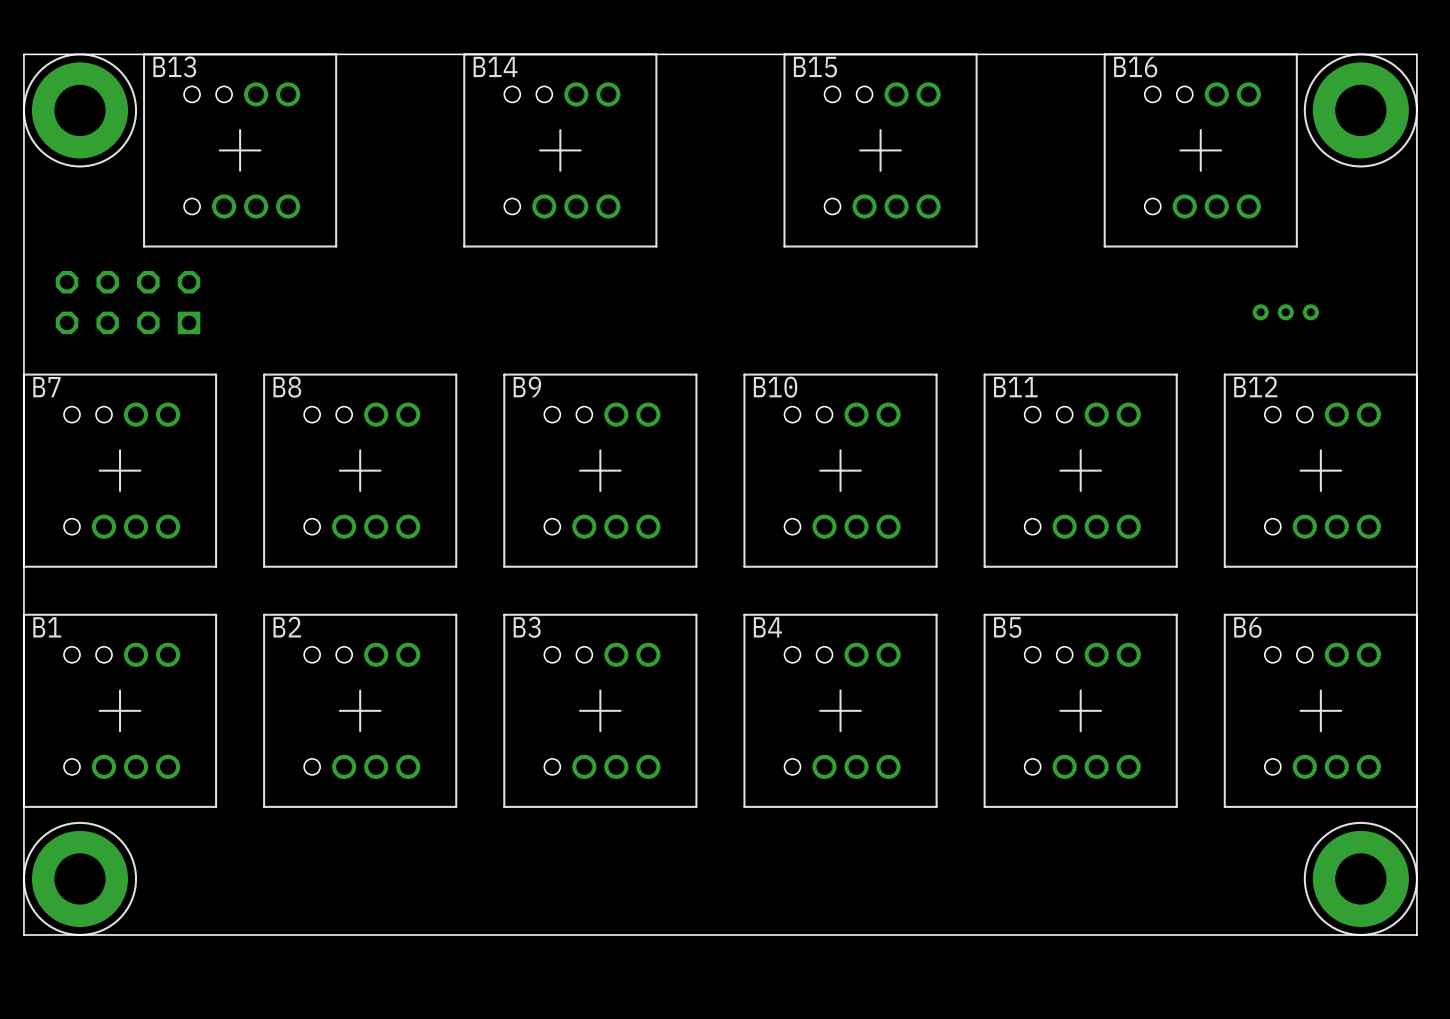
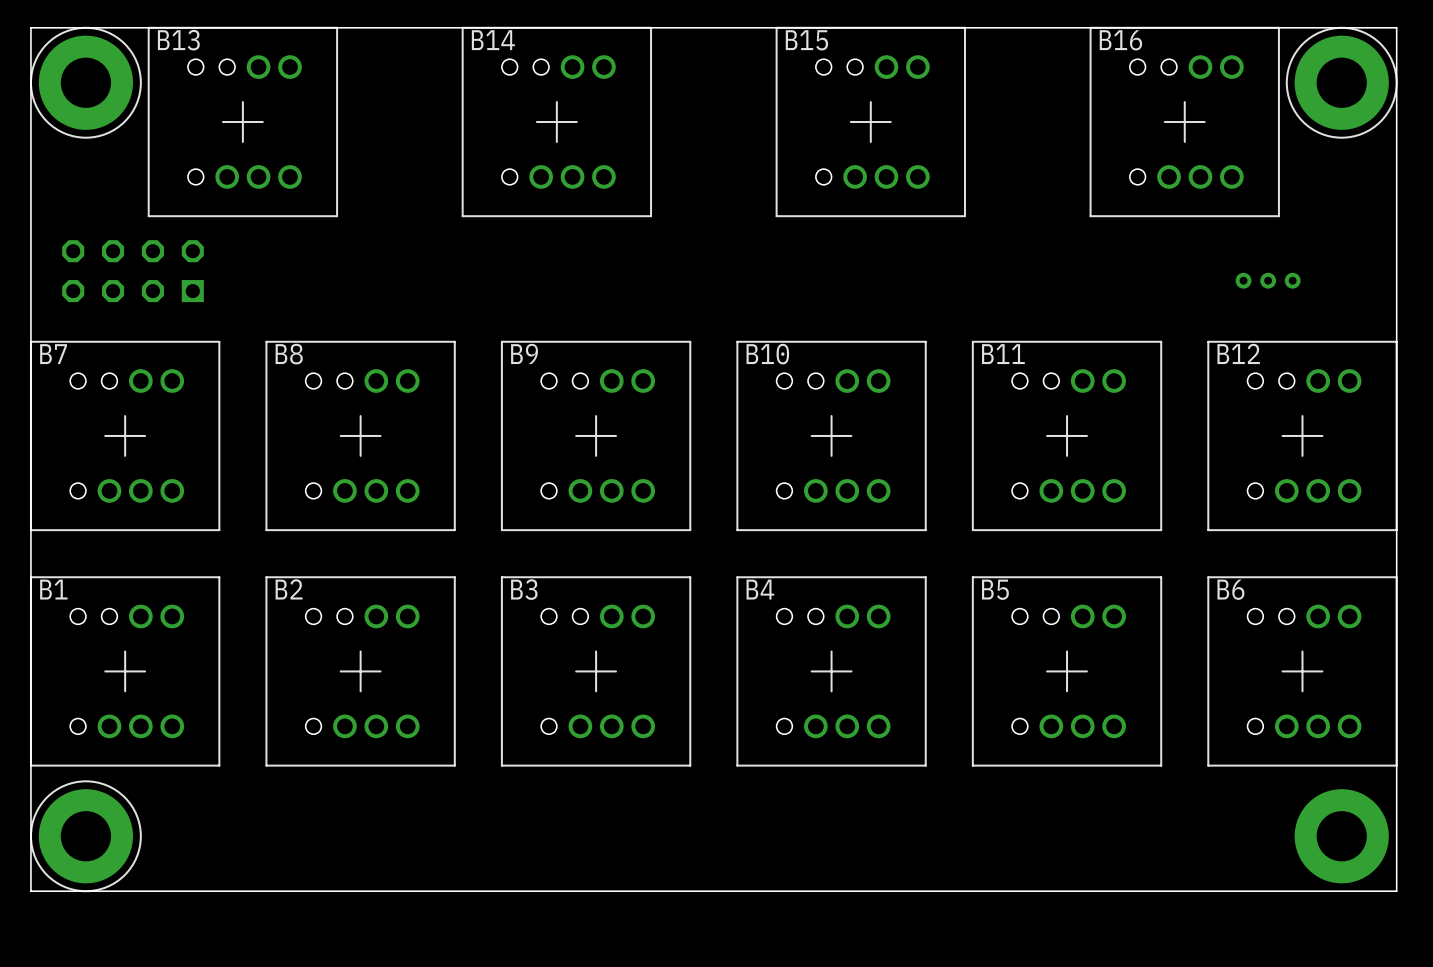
part side: top (1360, 878) -> bottom (1341, 836)

